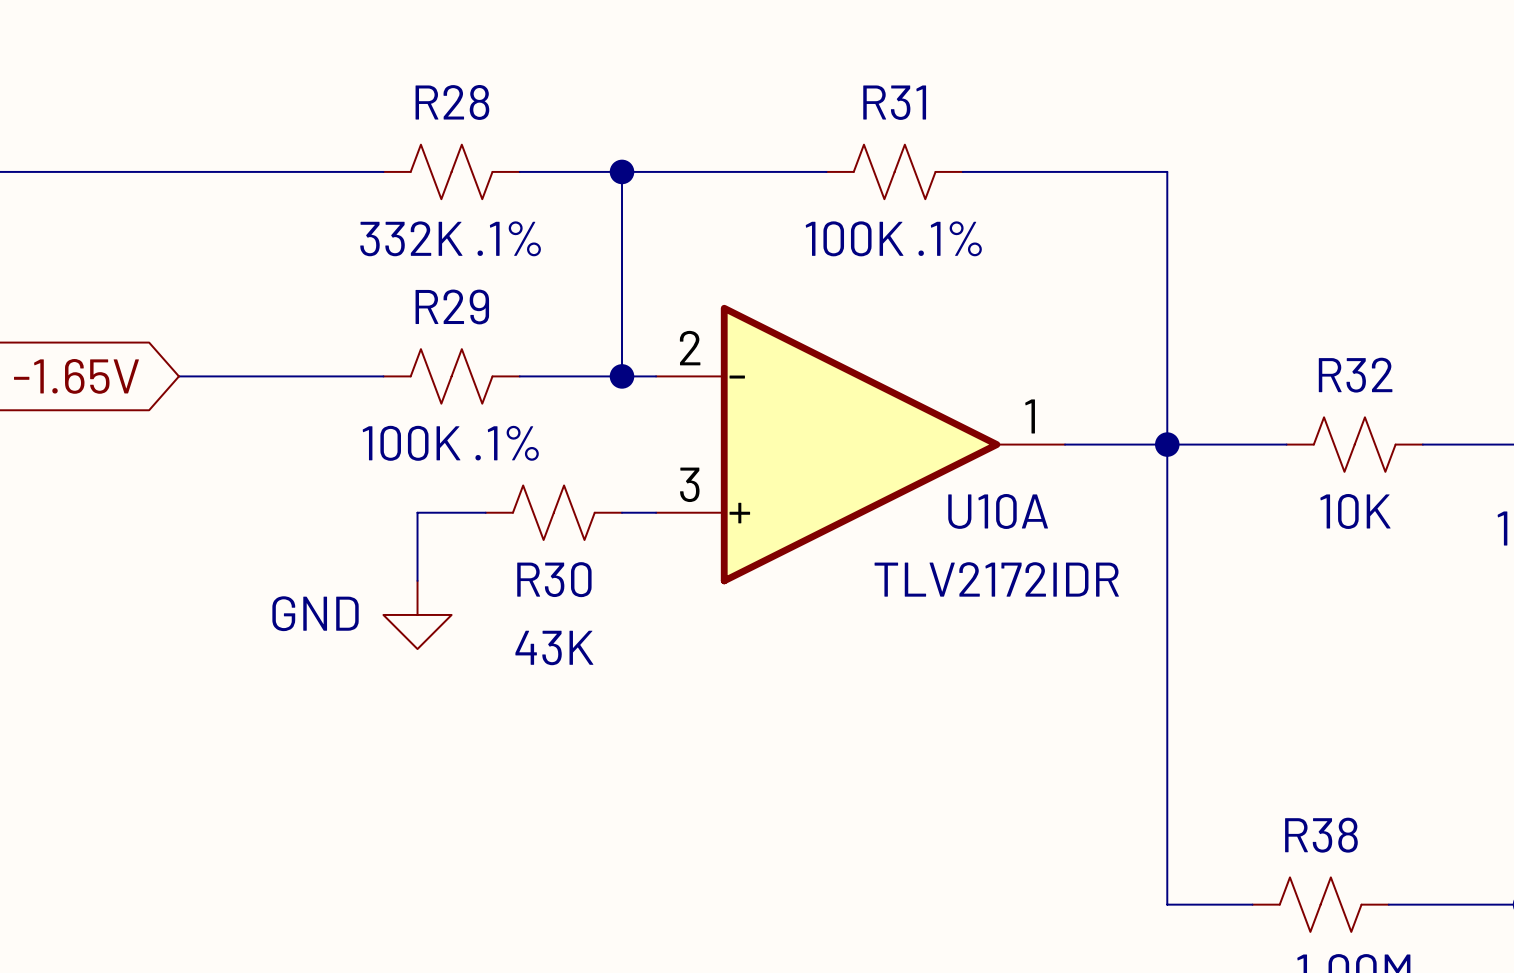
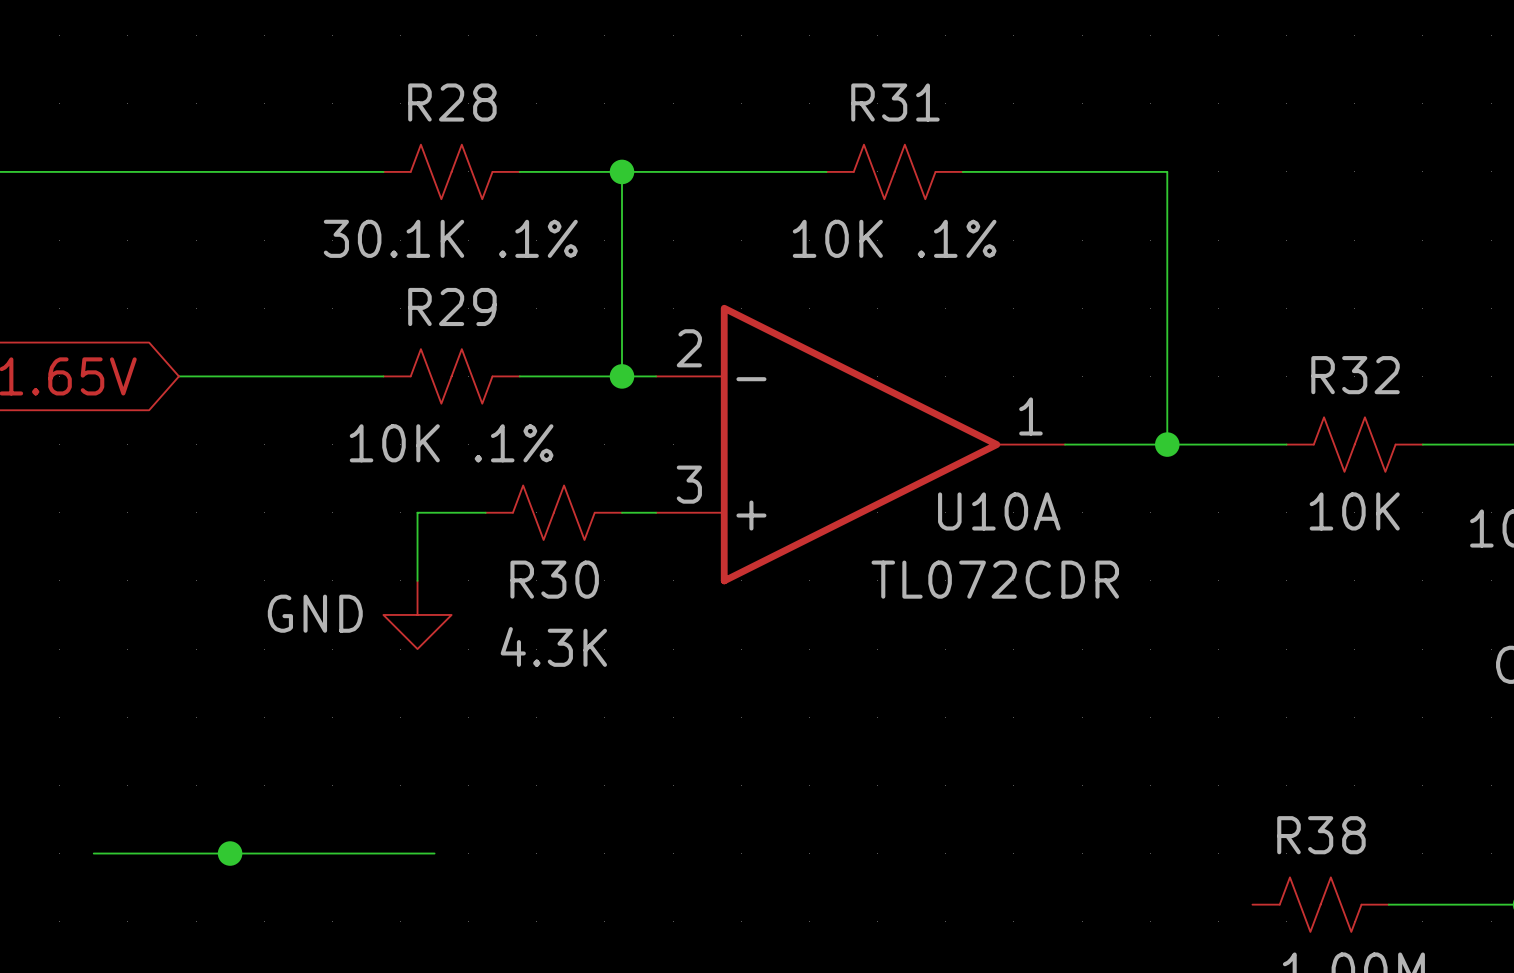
R28 value: 332K .1% (450, 238) -> 30.1K .1% (450, 238)
R31 value: 100K .1% (893, 238) -> 10K .1% (894, 238)
R29 value: 100K .1% (450, 443) -> 10K .1% (451, 443)
wire: (1167, 444) (1167, 904) (1252, 904) -> none
U10A value: TLV2172IDR (996, 579) -> TL072CDR (995, 579)
R30 value: 43K (554, 647) -> 4.3K (553, 646)
wire: none -> (93, 853) (434, 853)
junction: none -> (230, 853)

